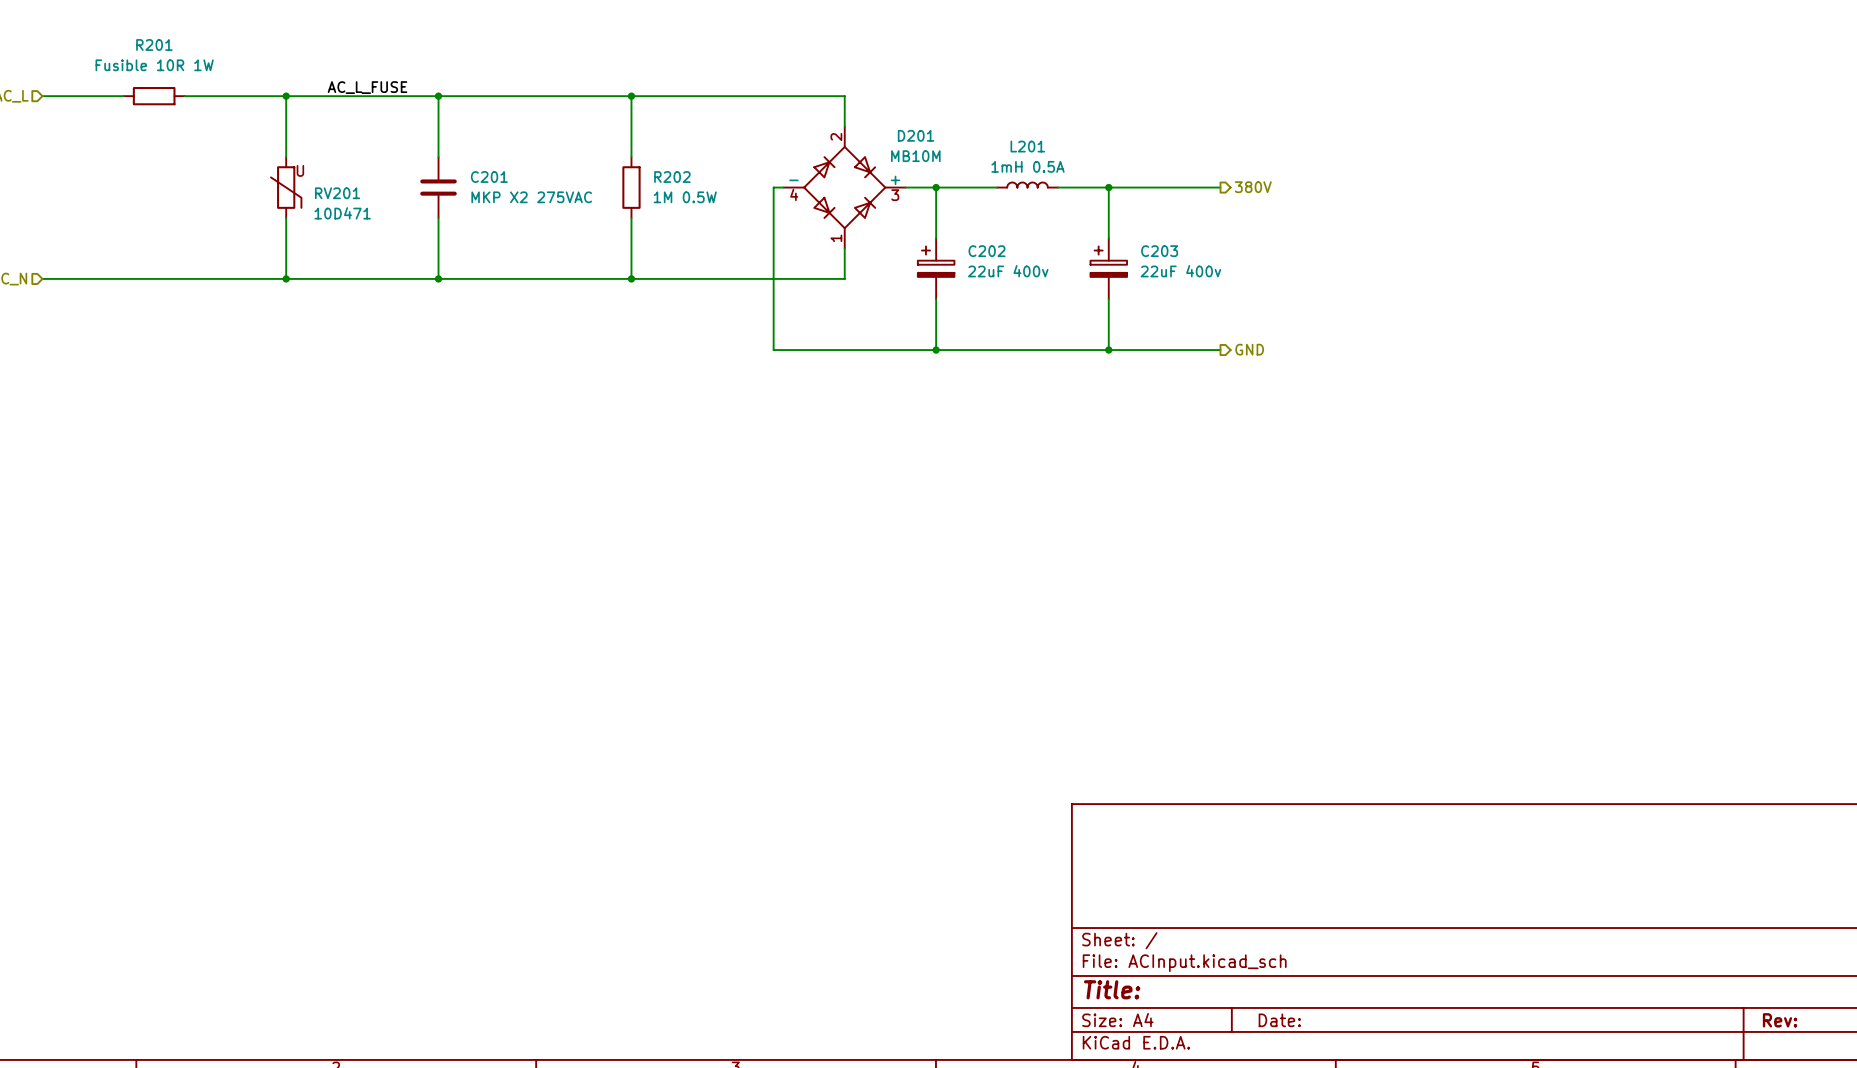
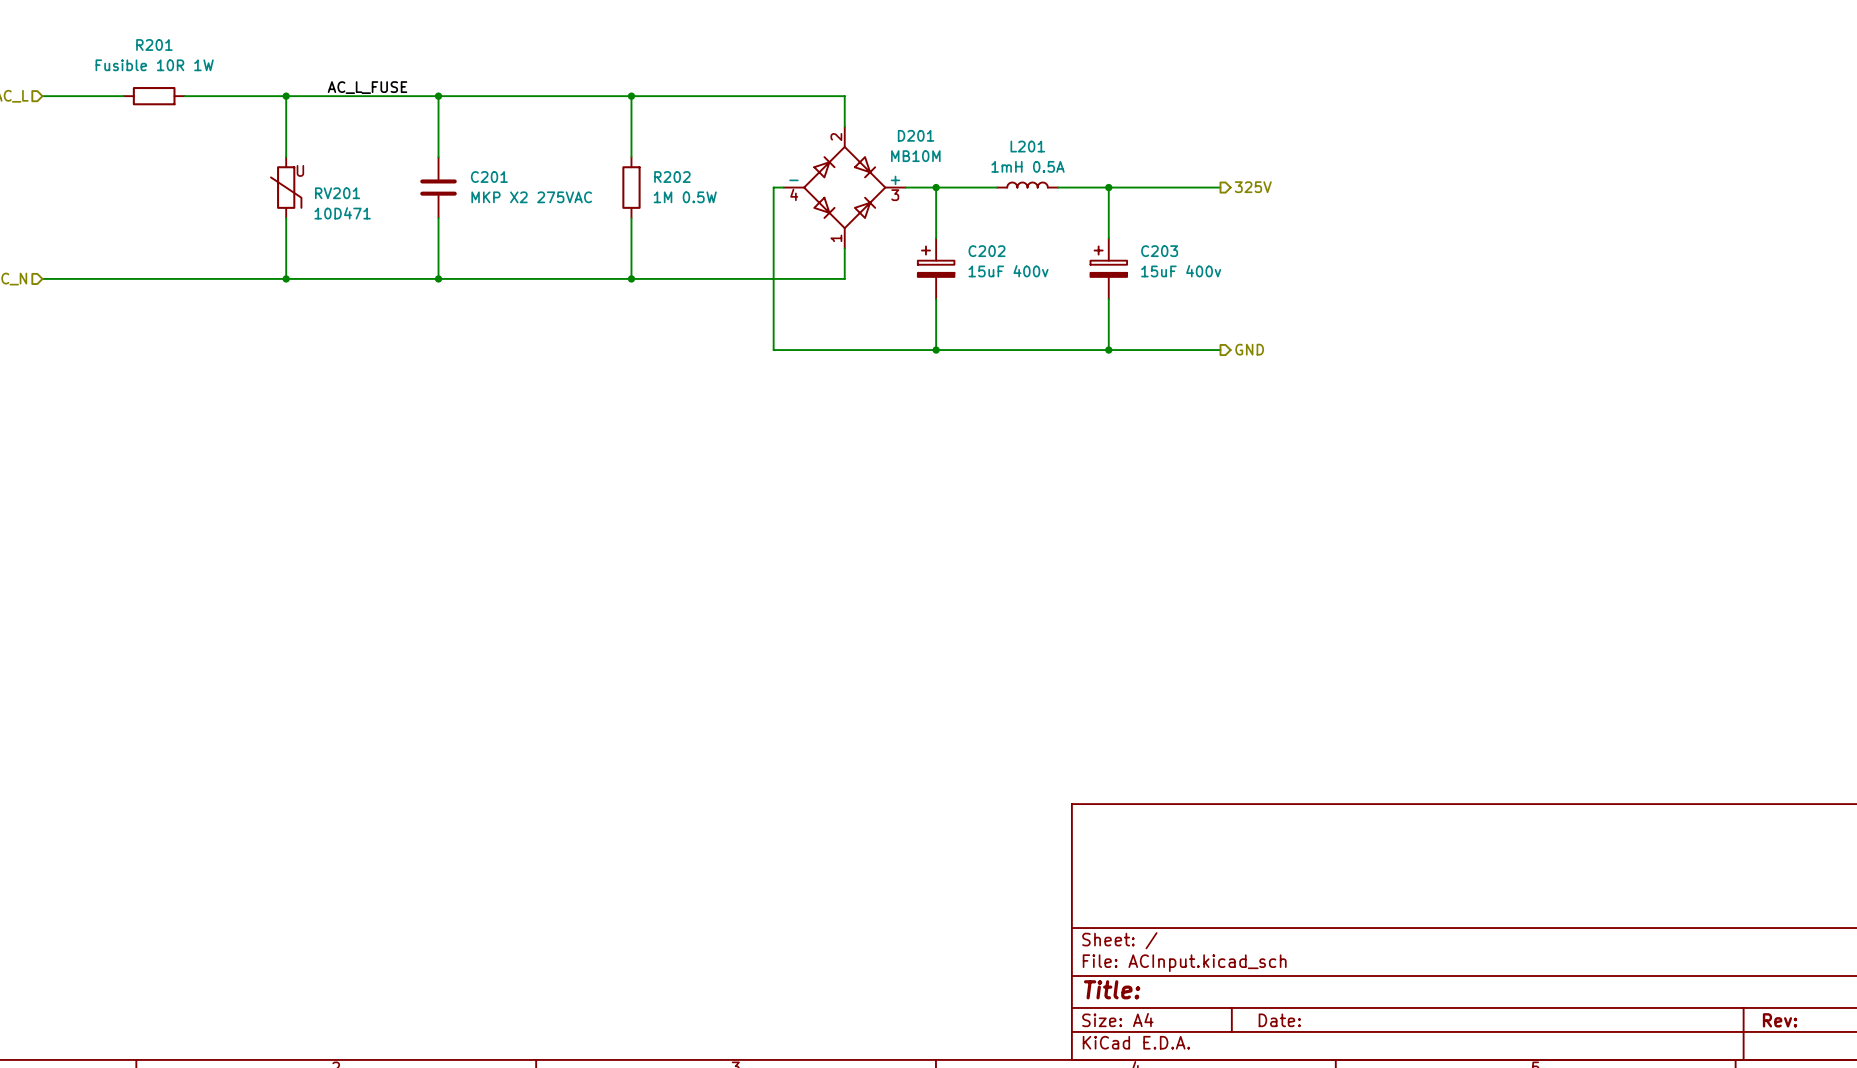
hierarchical label: 380V (1253, 187) -> 325V (1253, 187)
C202 value: 22uF 400v (1008, 271) -> 15uF 400v (1008, 271)
C203 value: 22uF 400v (1180, 271) -> 15uF 400v (1181, 271)

